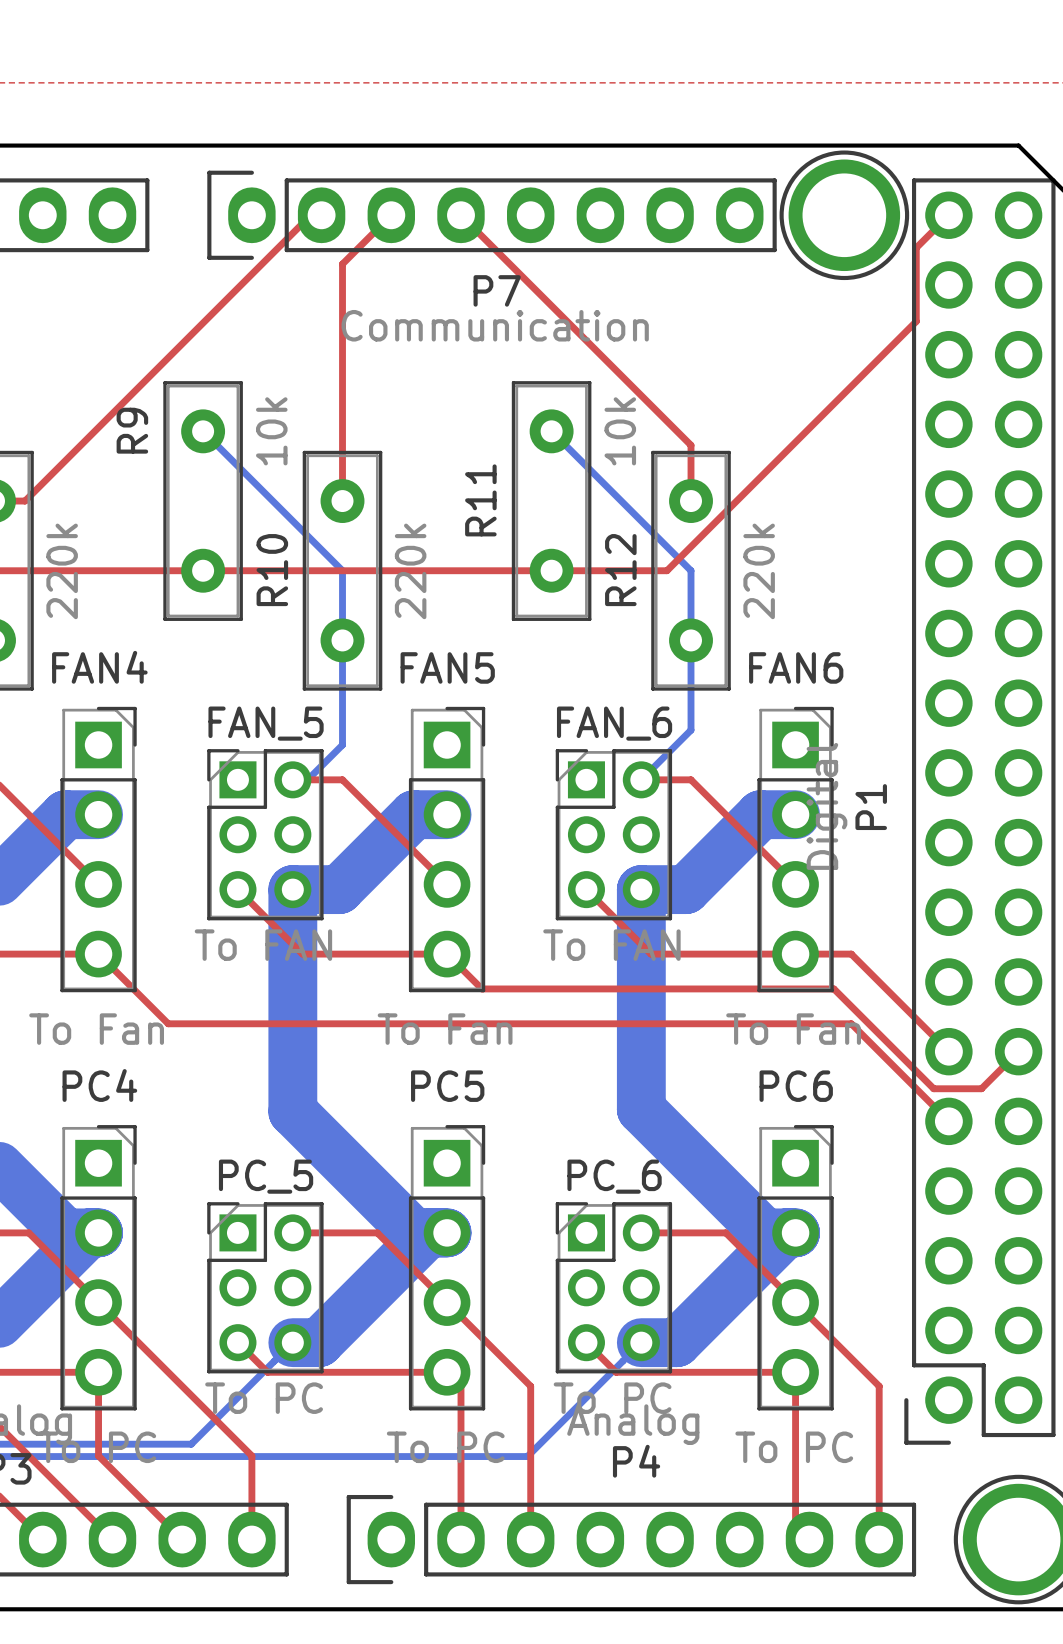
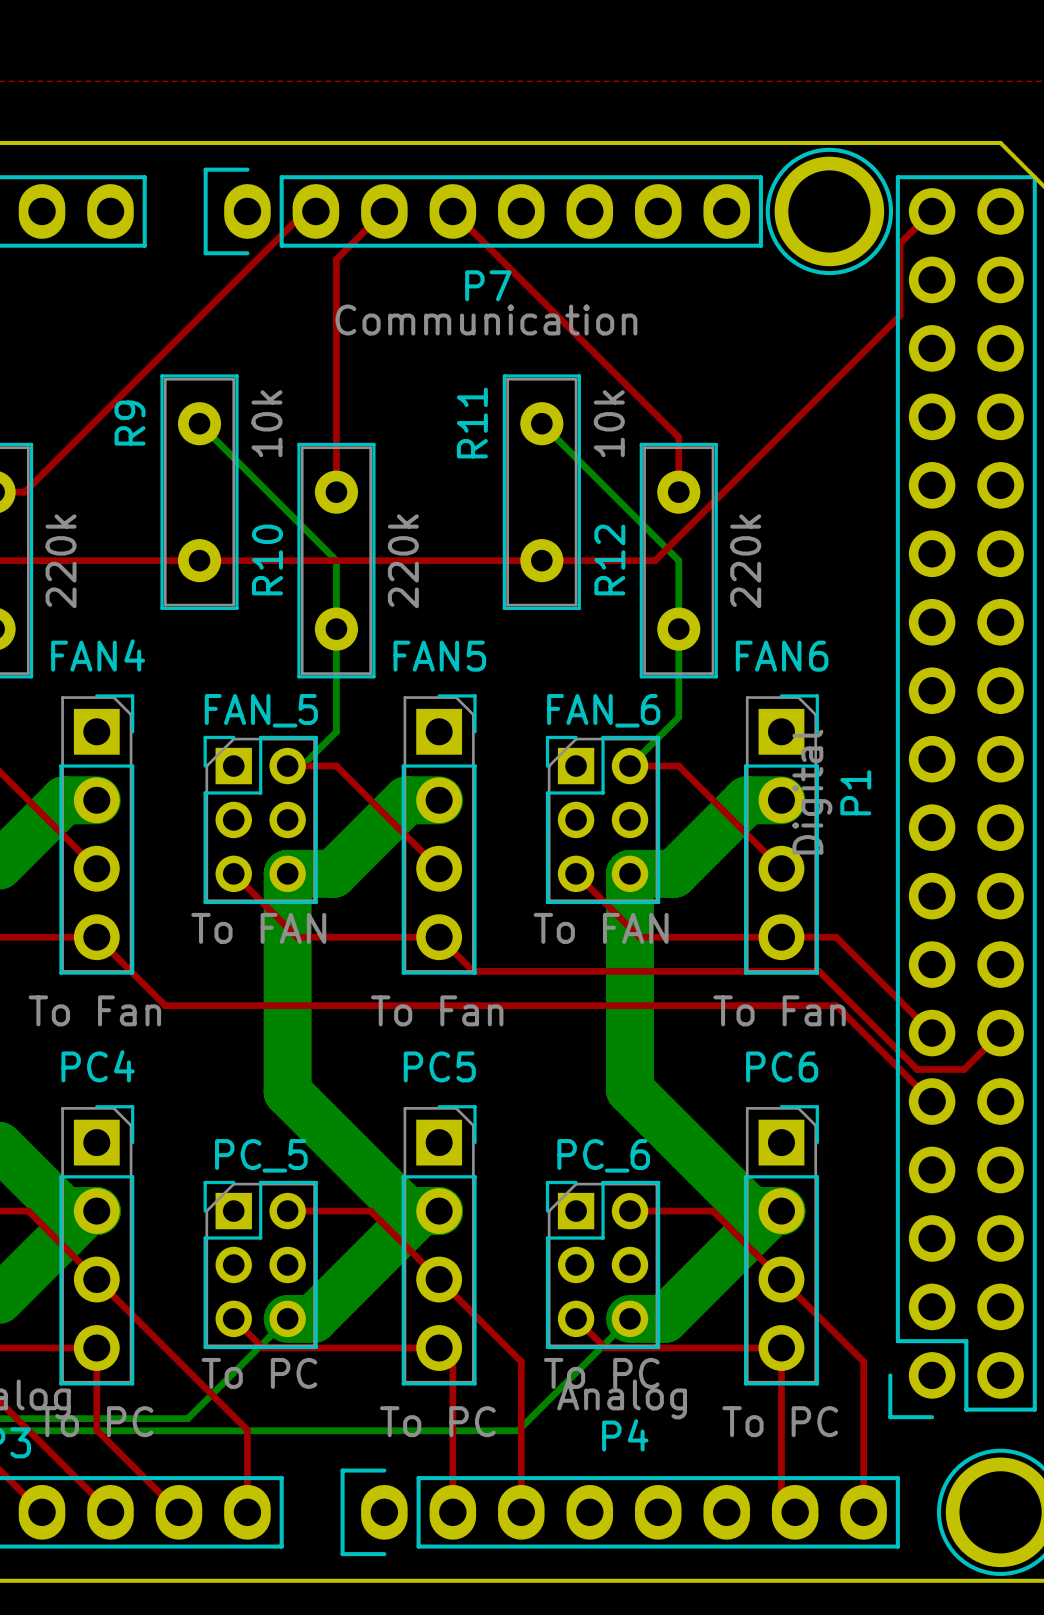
R11 name position: R11 (480, 500) -> R11 (472, 423)

